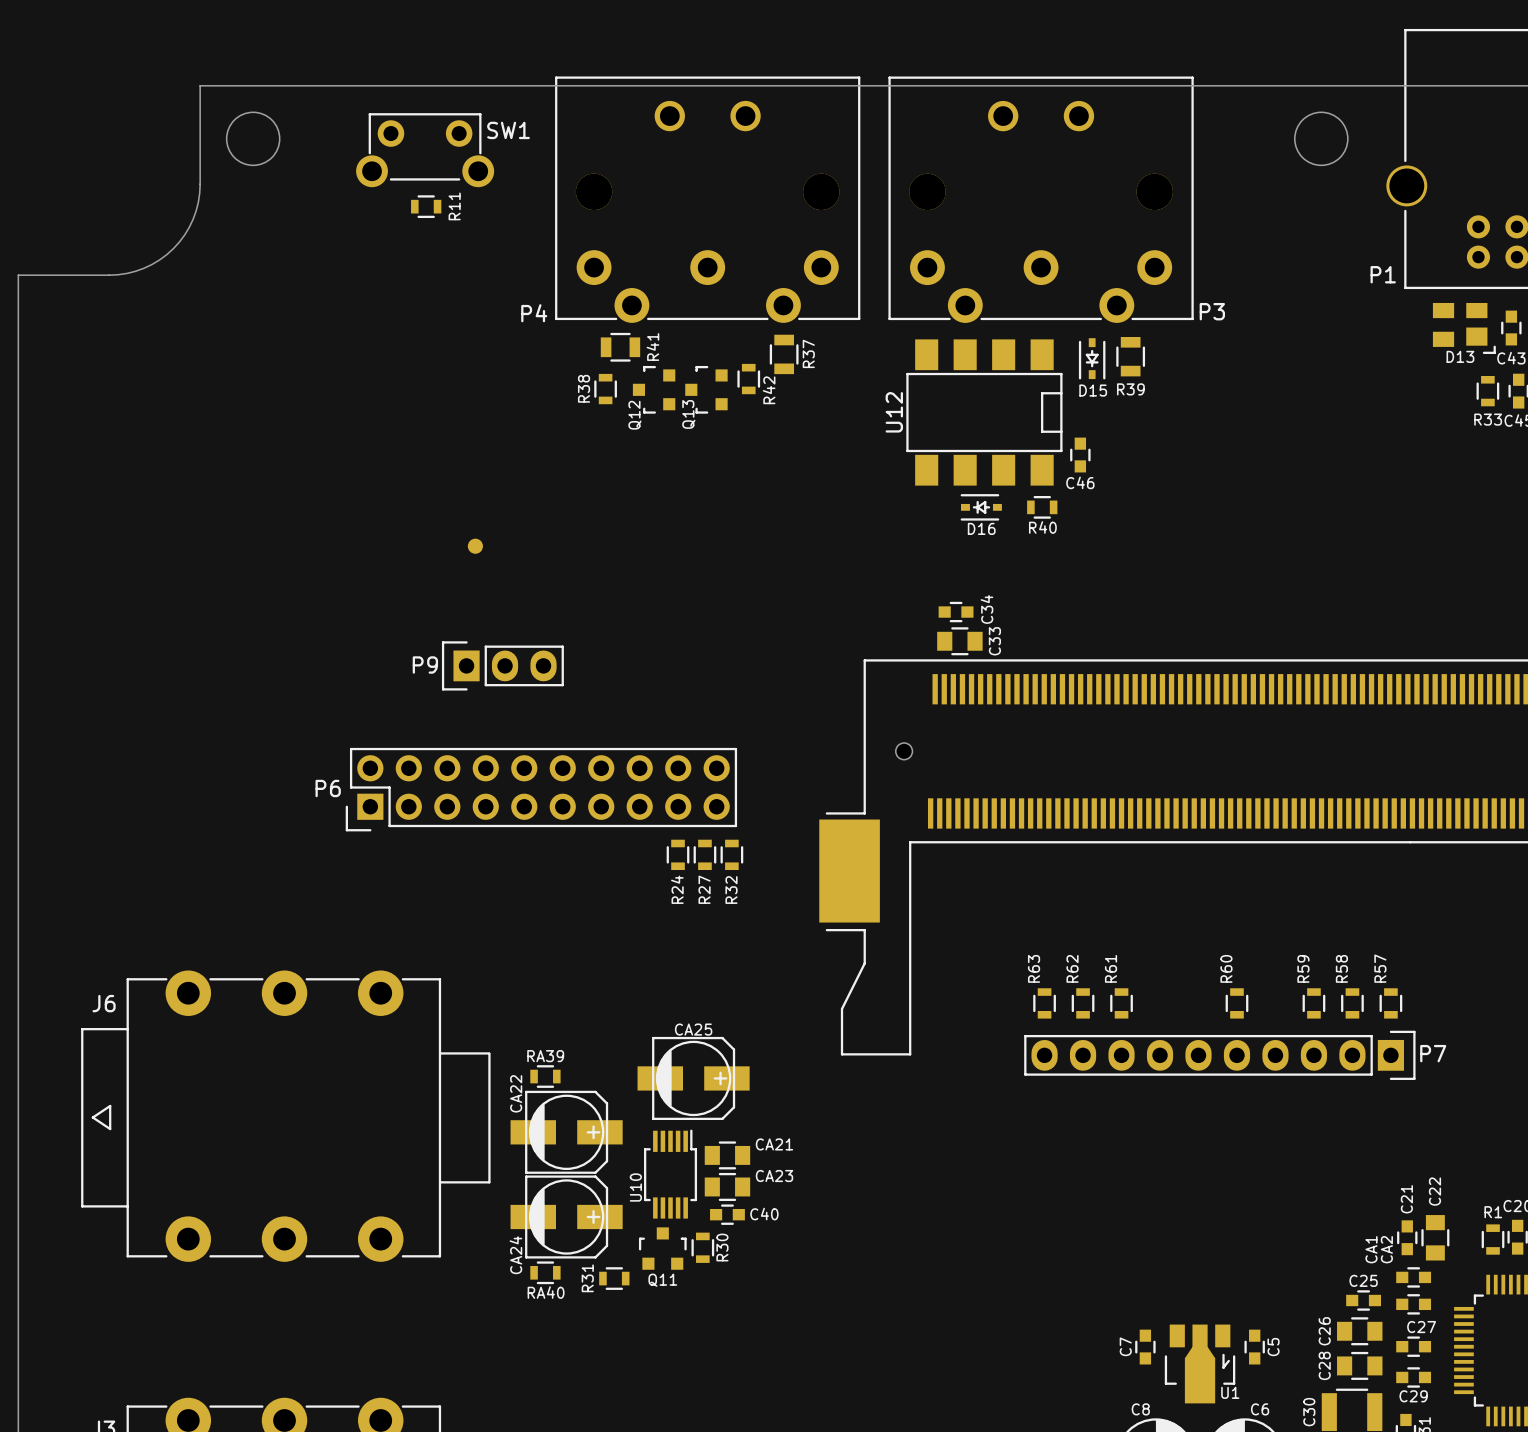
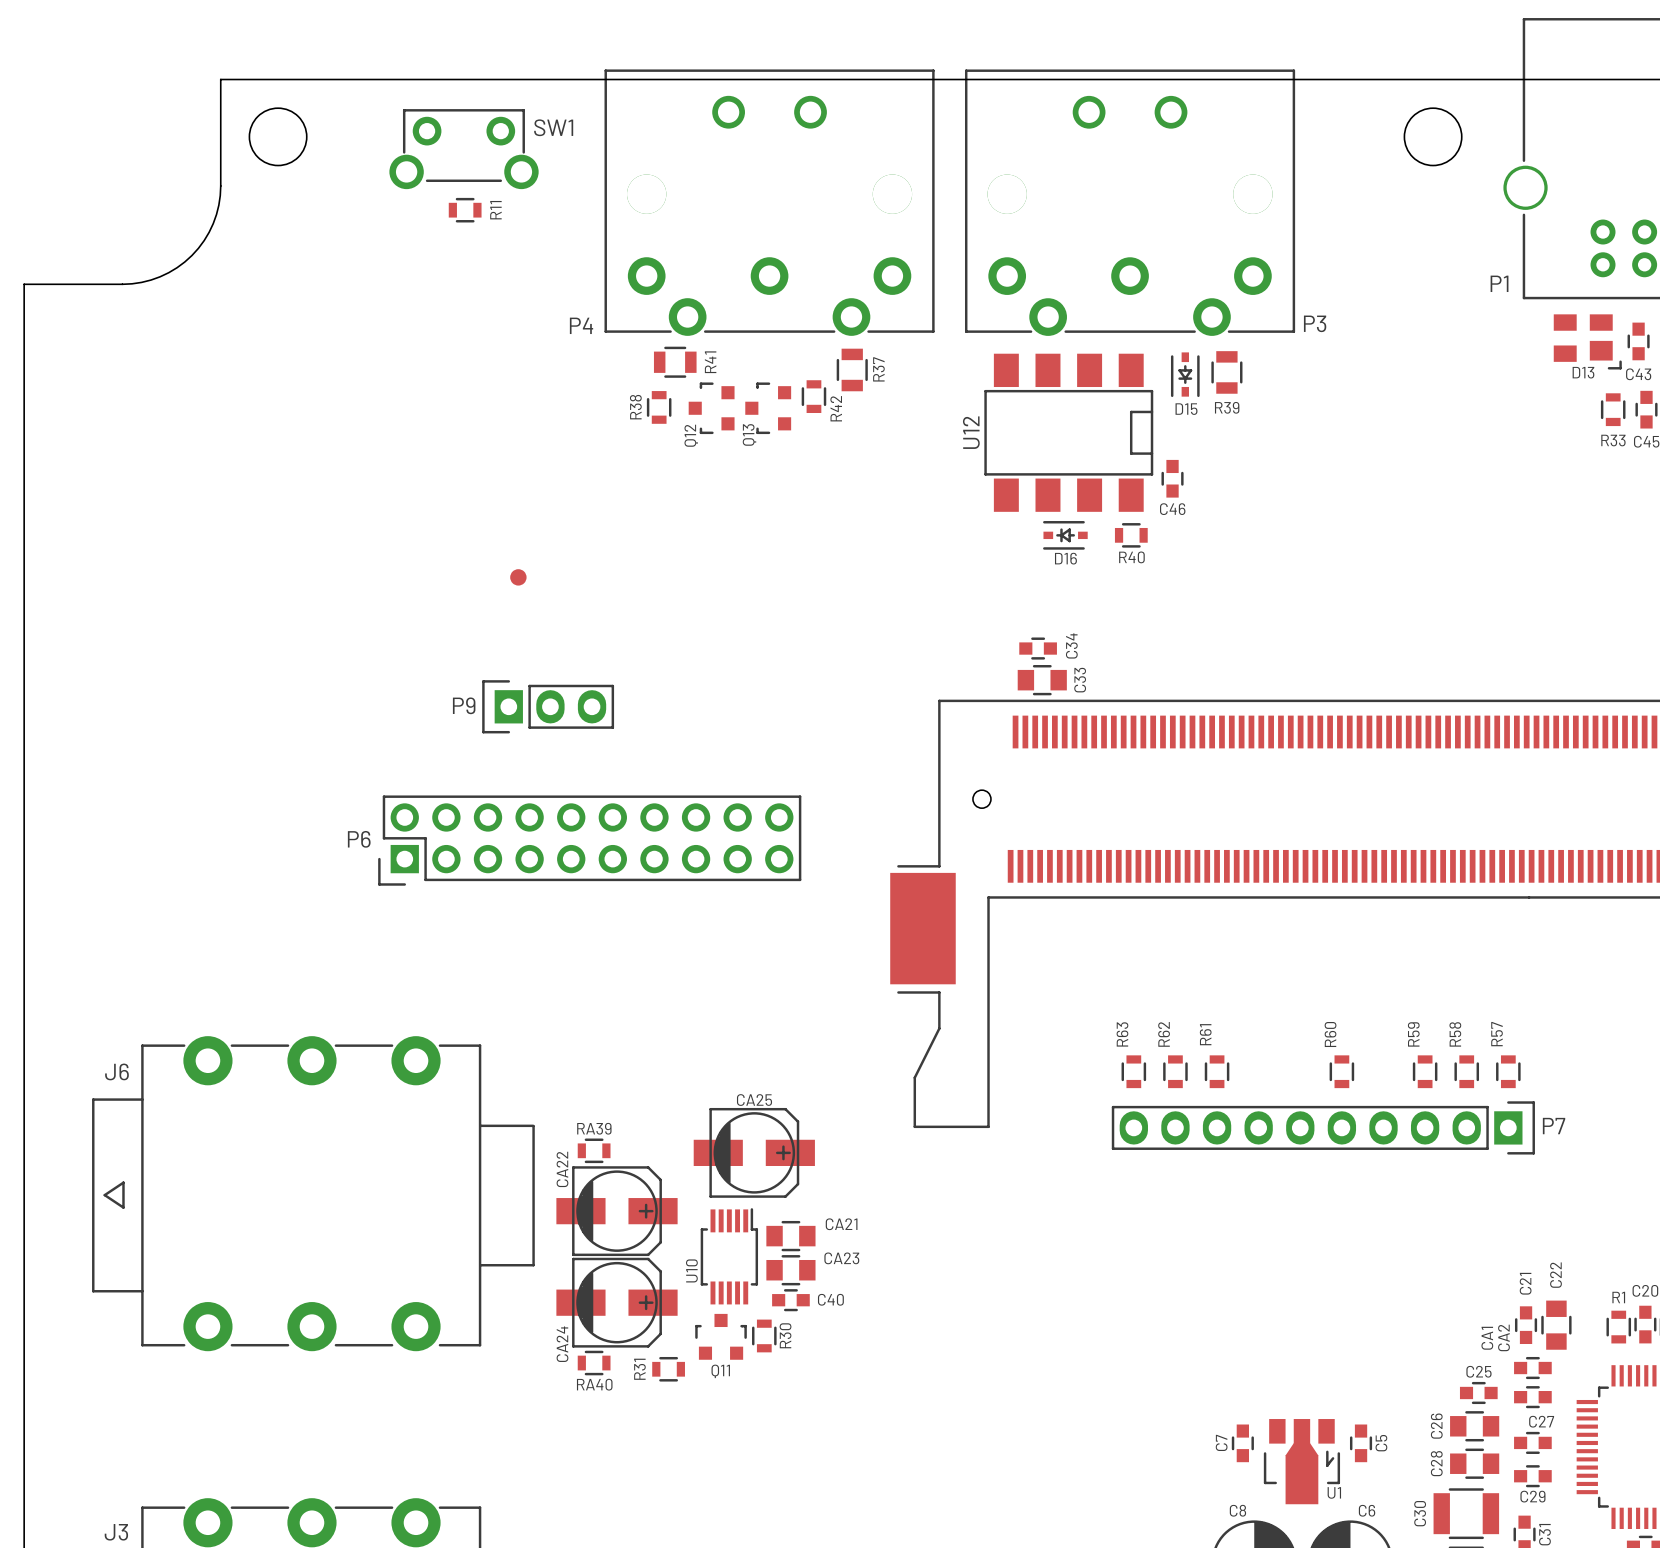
R24: (678, 854) -> none
R27: (704, 854) -> none
R32: (731, 854) -> none

